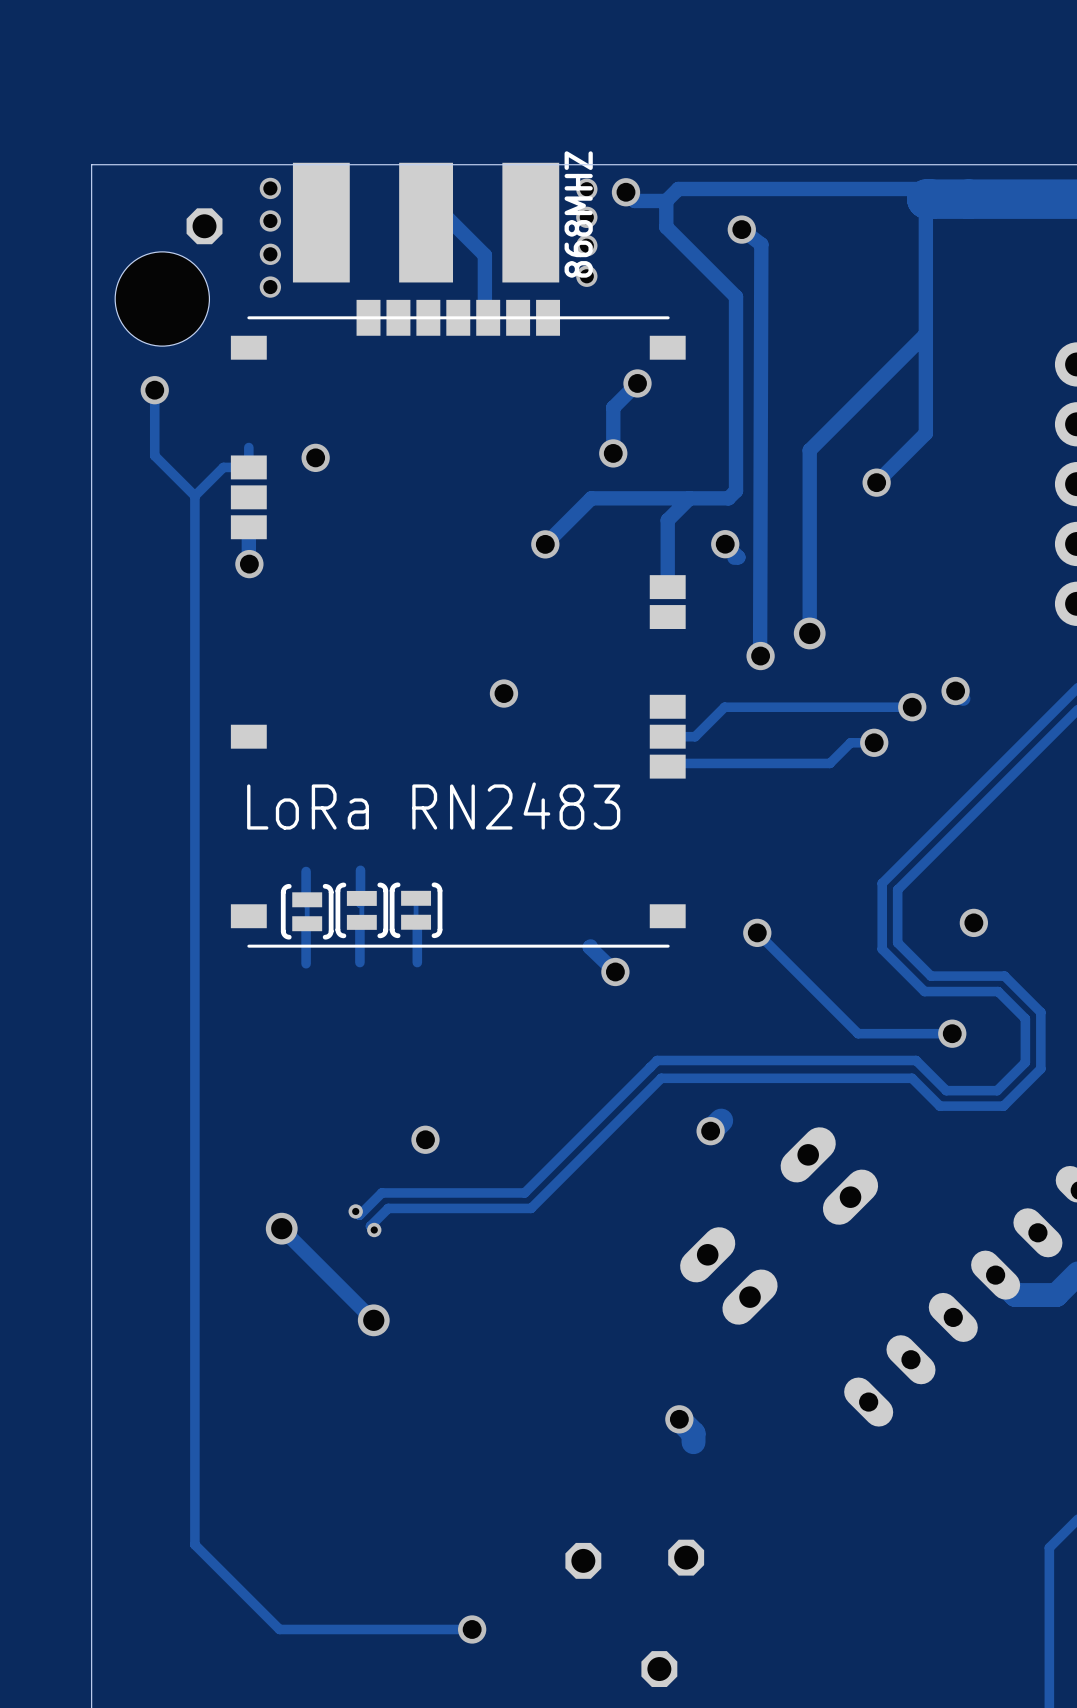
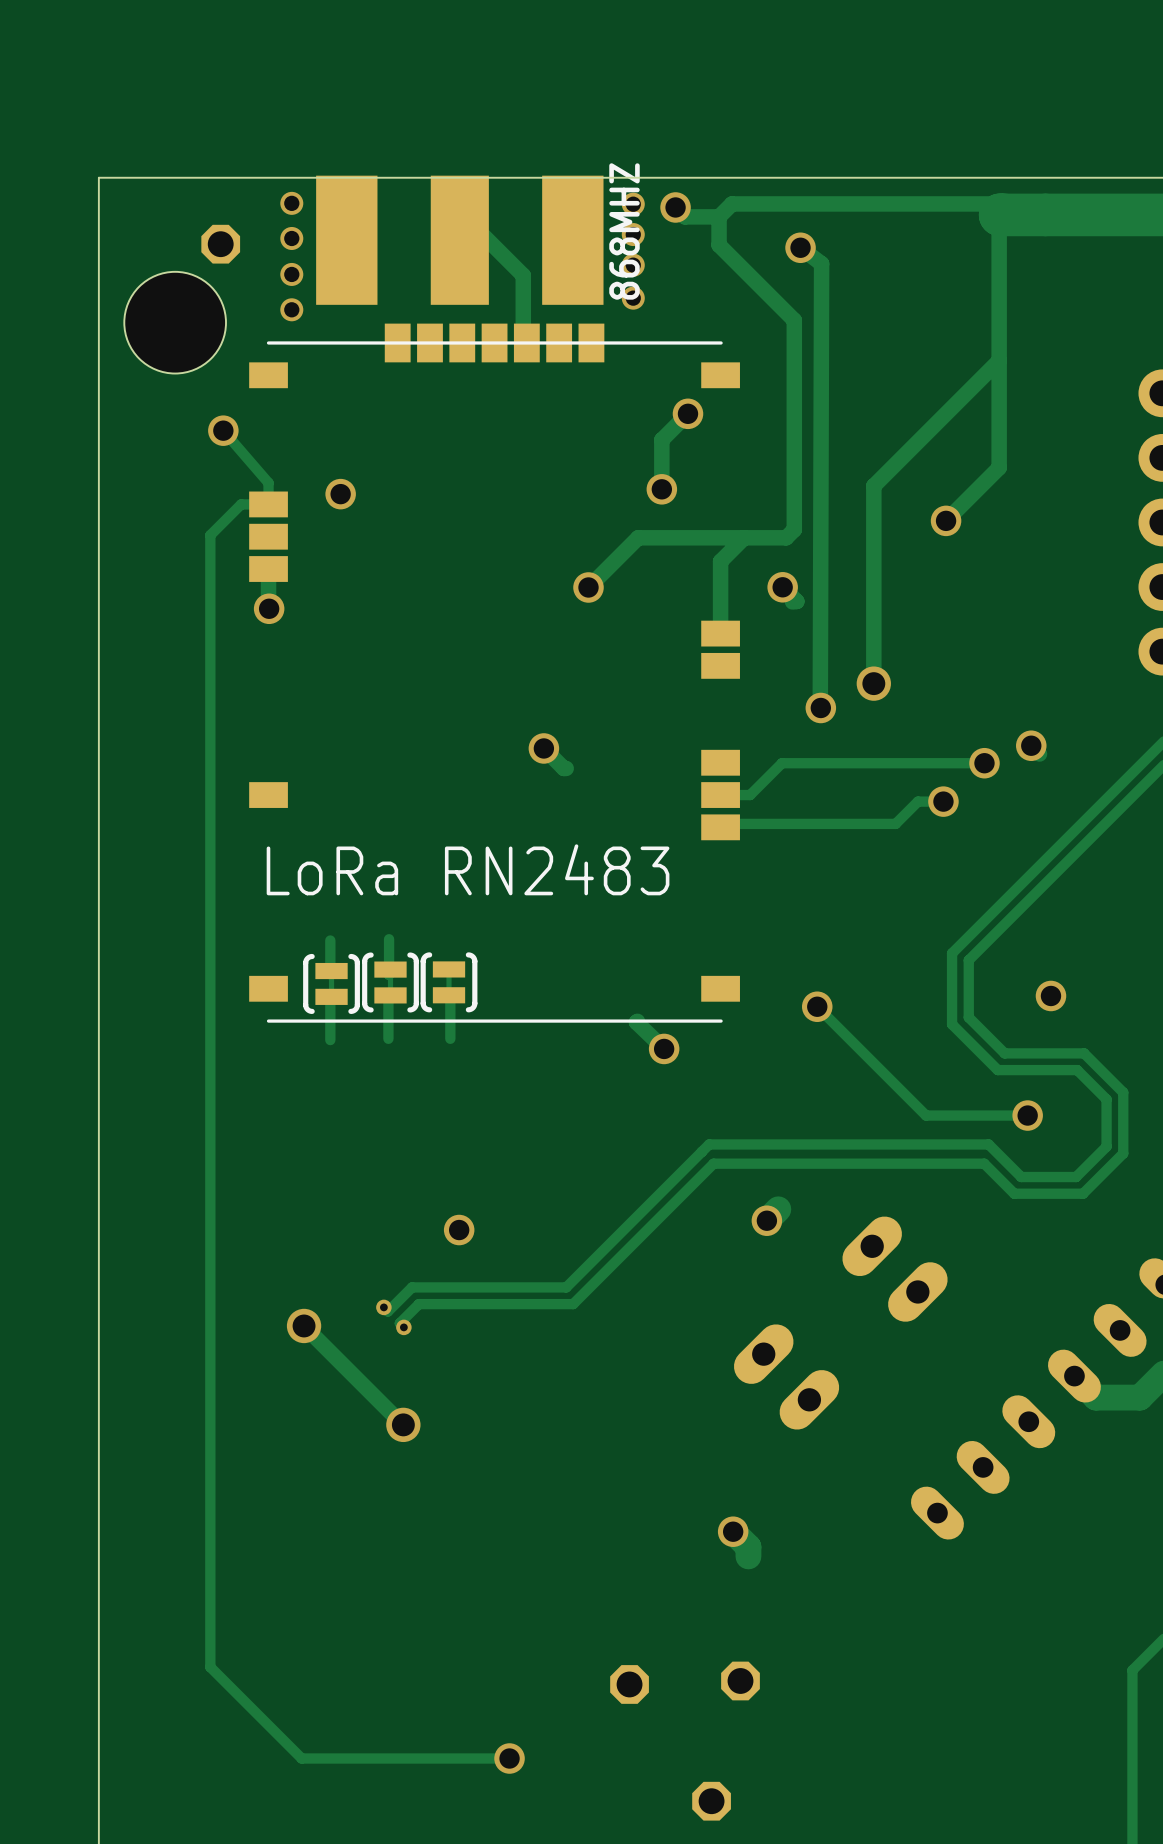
track: (154, 390) (154, 455) (194, 495) -> none
via position: (154, 390) -> (223, 430)
track: none -> (223, 430) (268, 482)
track: none -> (543, 748) (563, 768) (566, 768)

